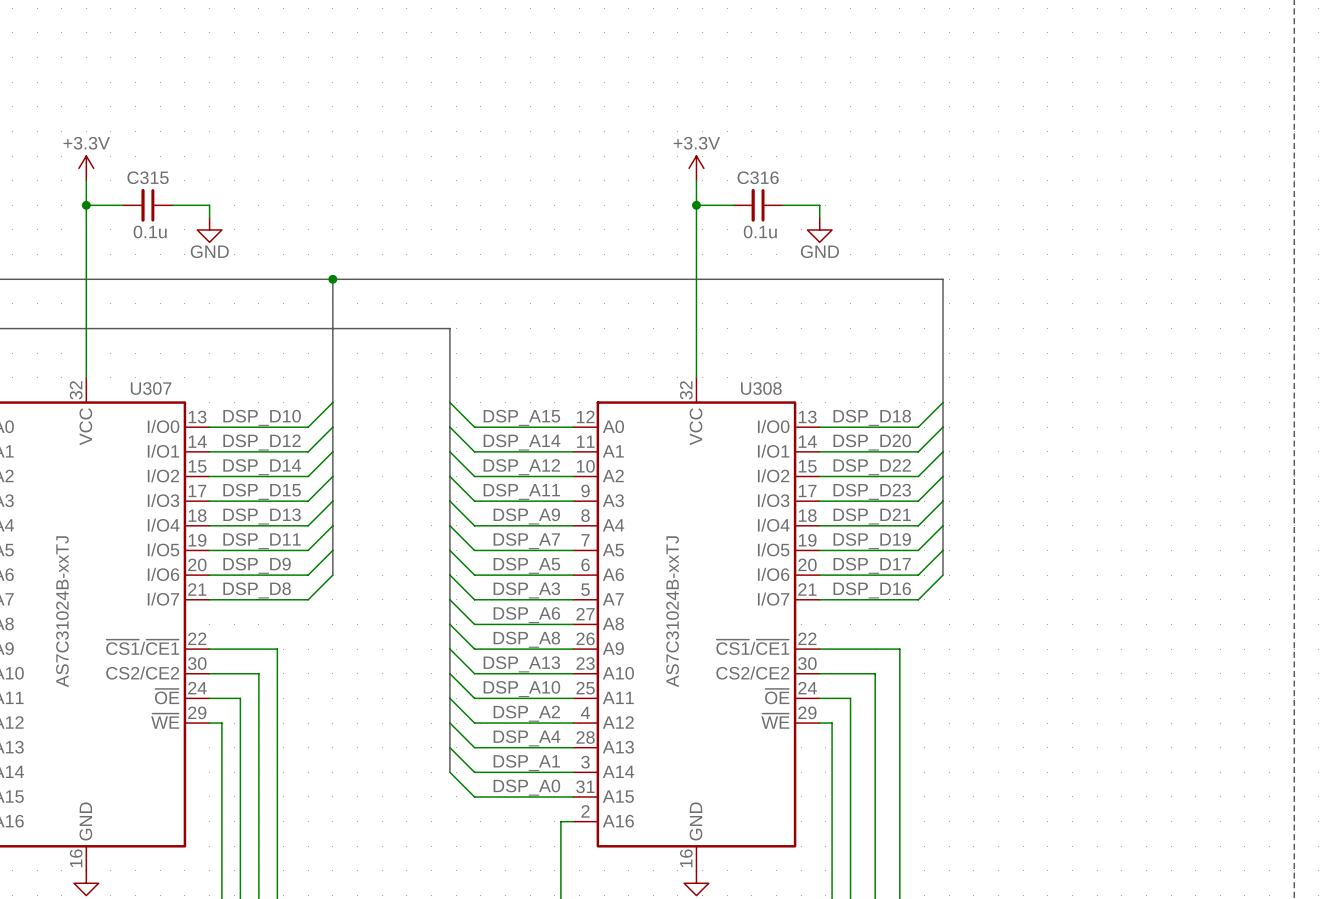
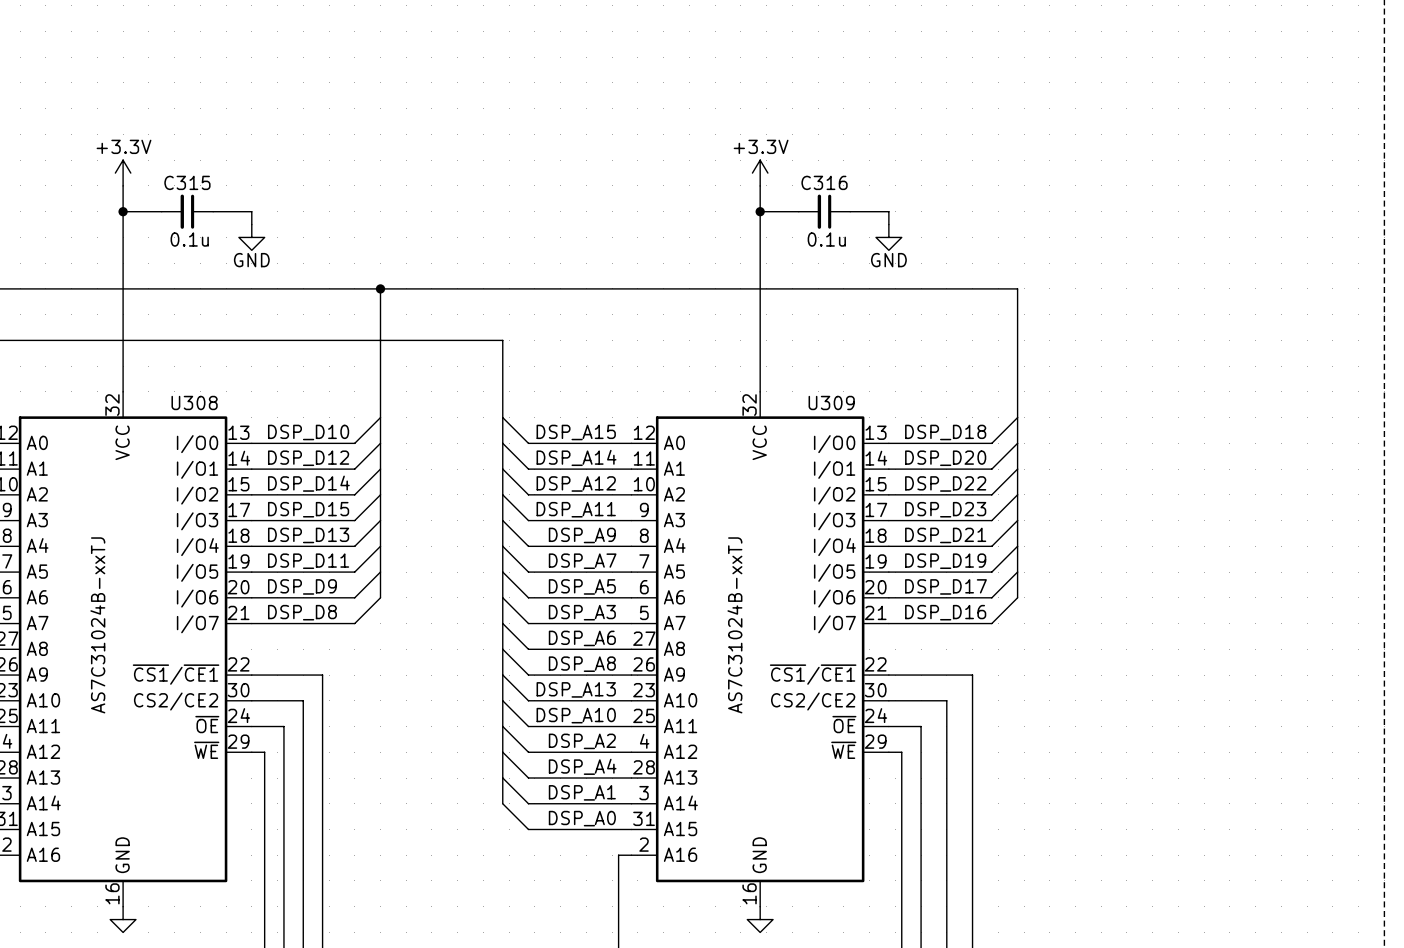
U307 name: U307 (151, 388) -> U308 (194, 402)
U308 name: U308 (761, 388) -> U309 (831, 402)

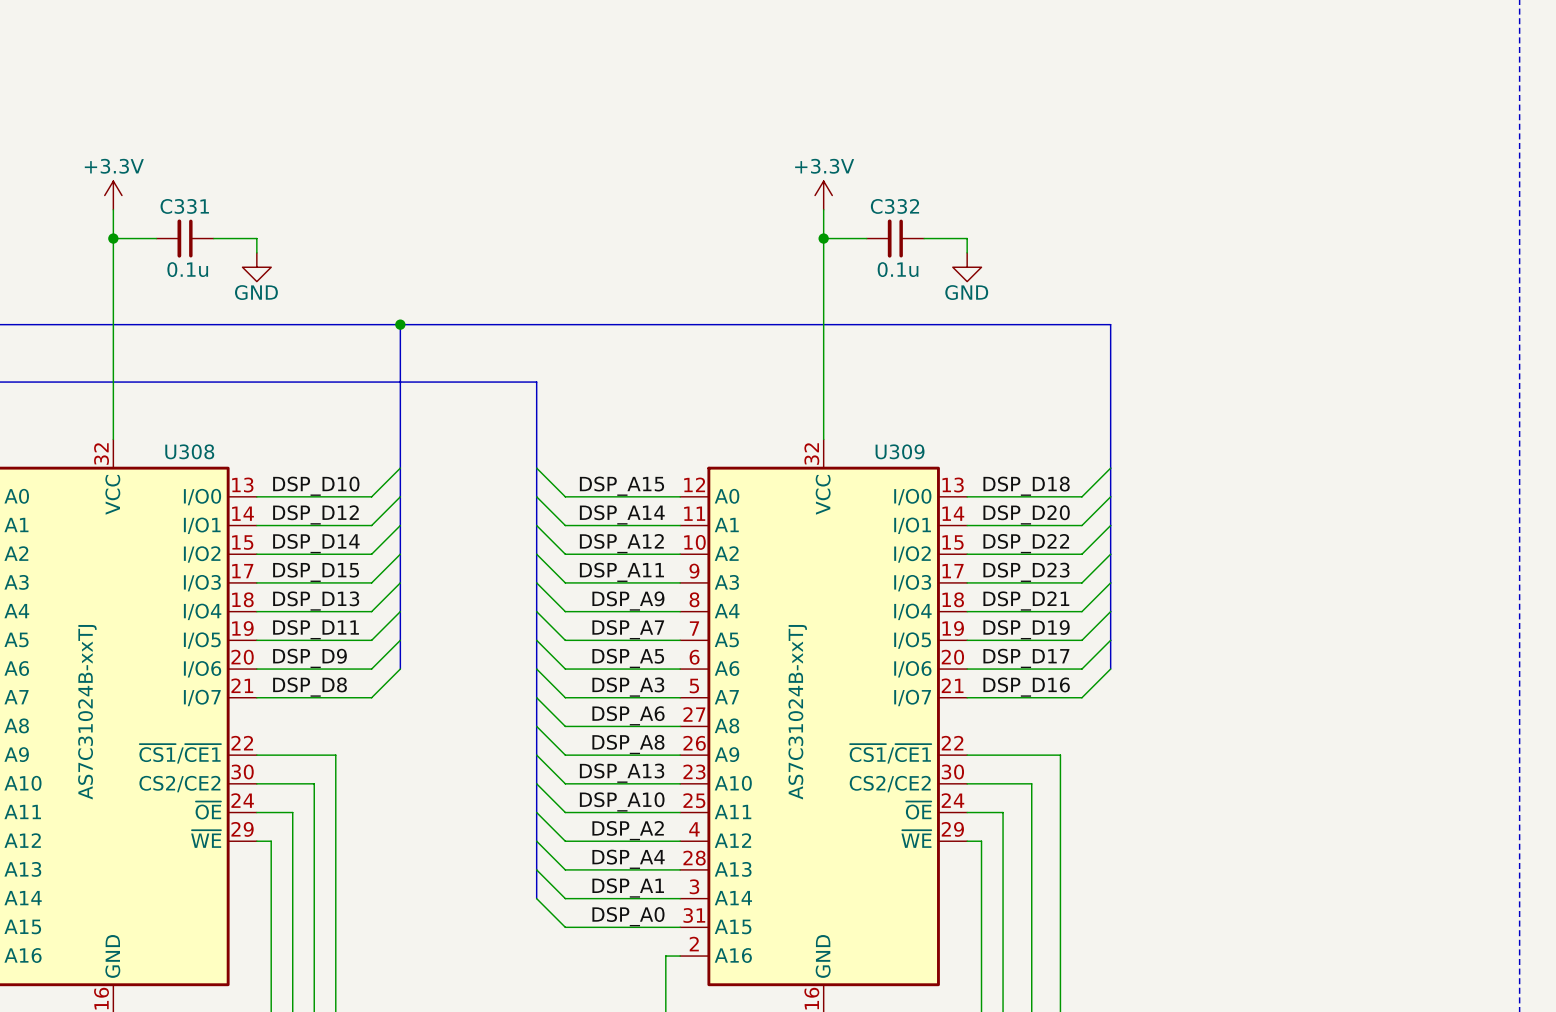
C315 name: C315 (187, 182) -> C331 (184, 206)
C316 name: C316 (824, 182) -> C332 (894, 206)

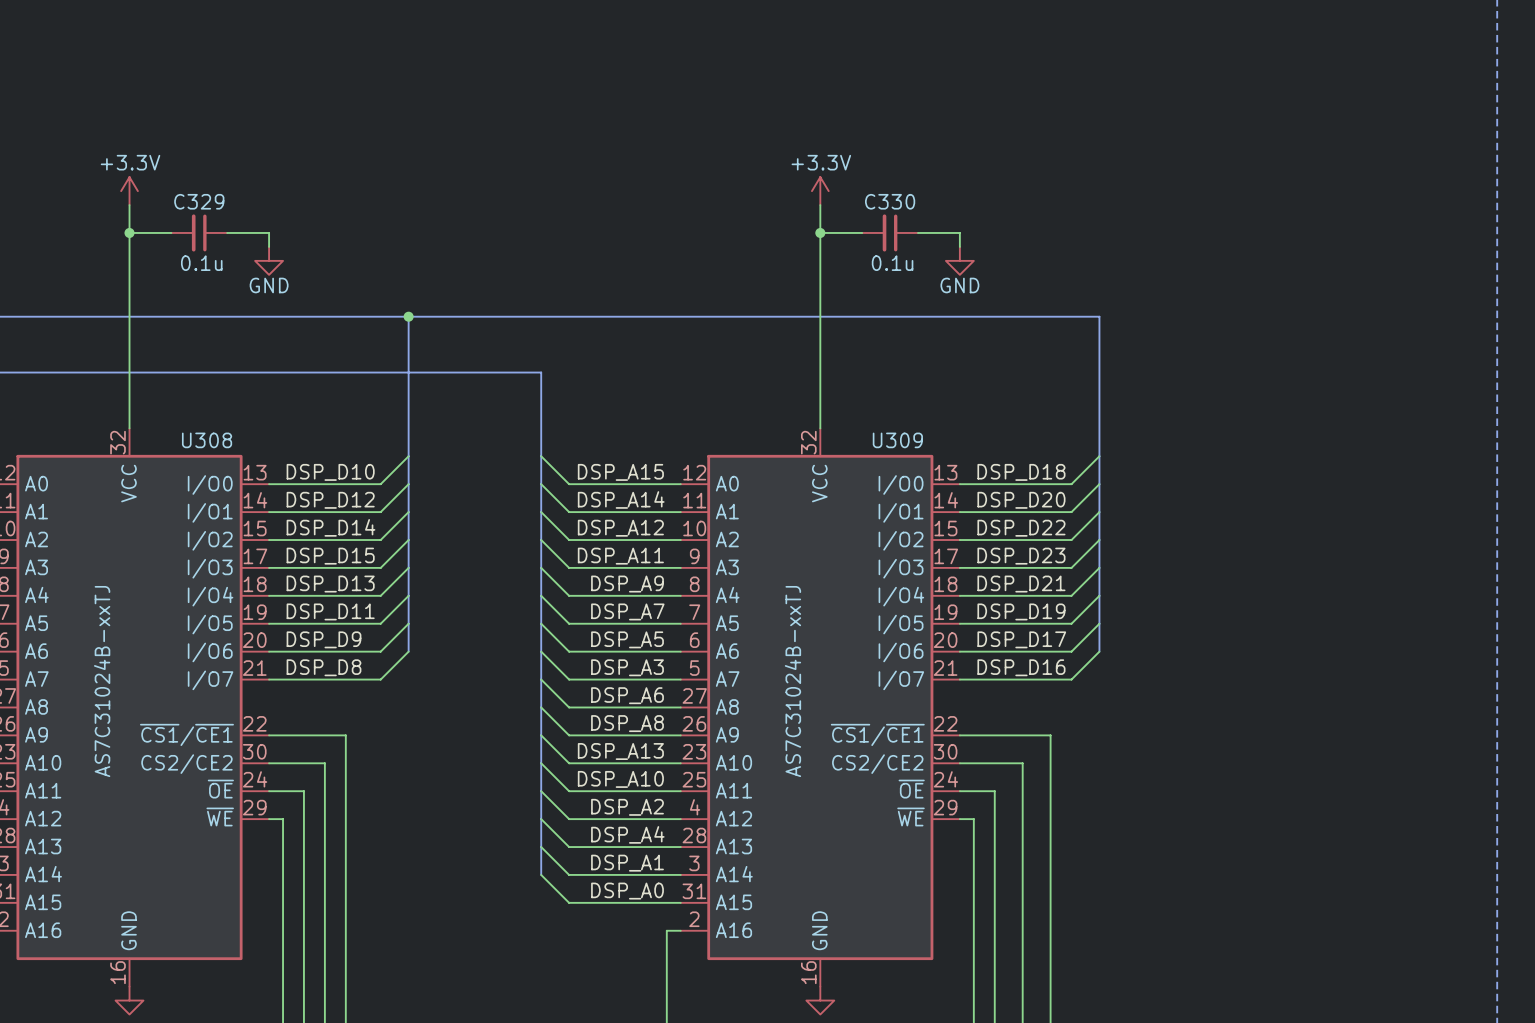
C331 name: C331 (184, 206) -> C329 (199, 201)
C332 name: C332 (894, 206) -> C330 (890, 201)

